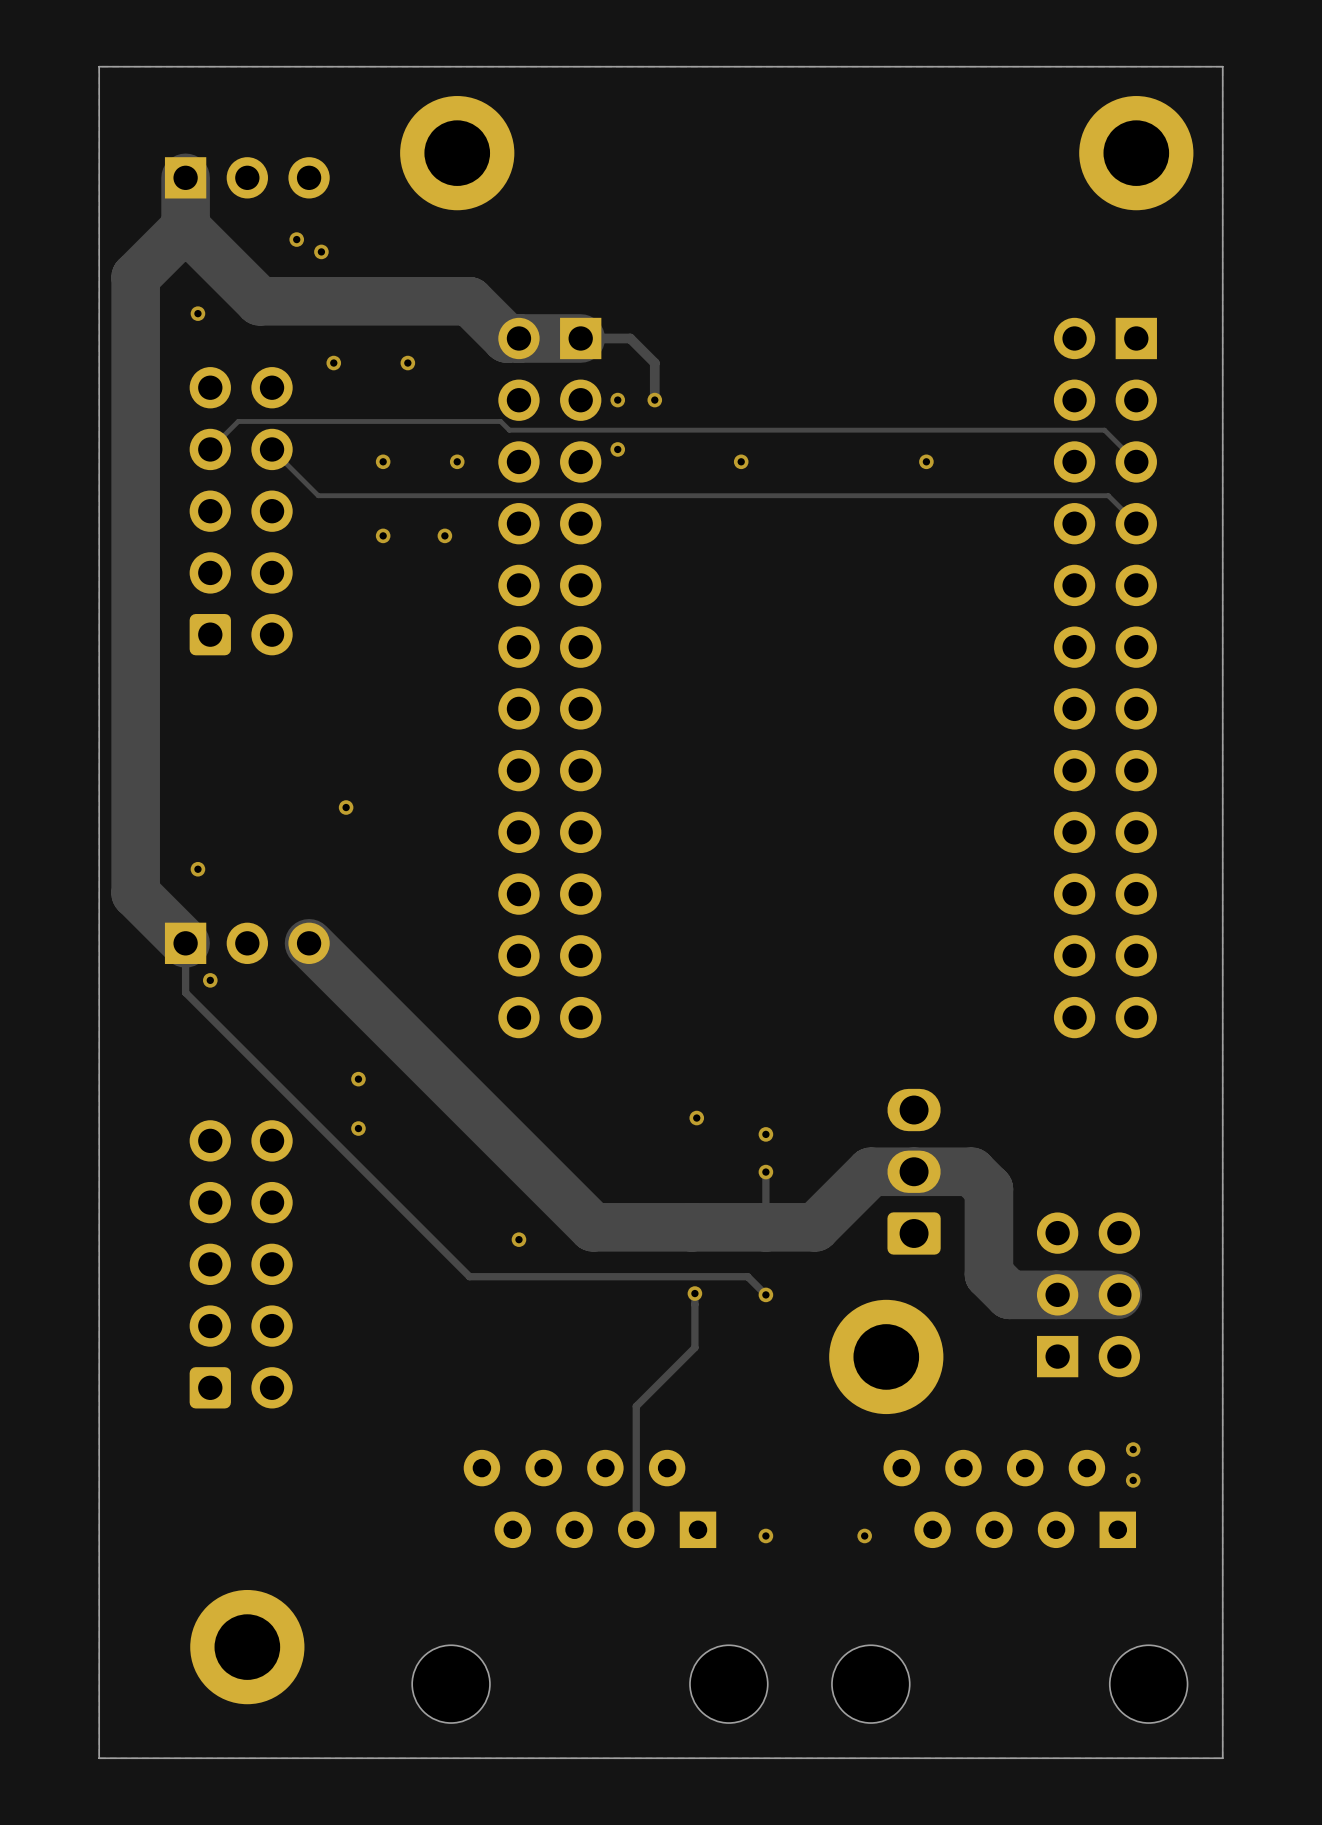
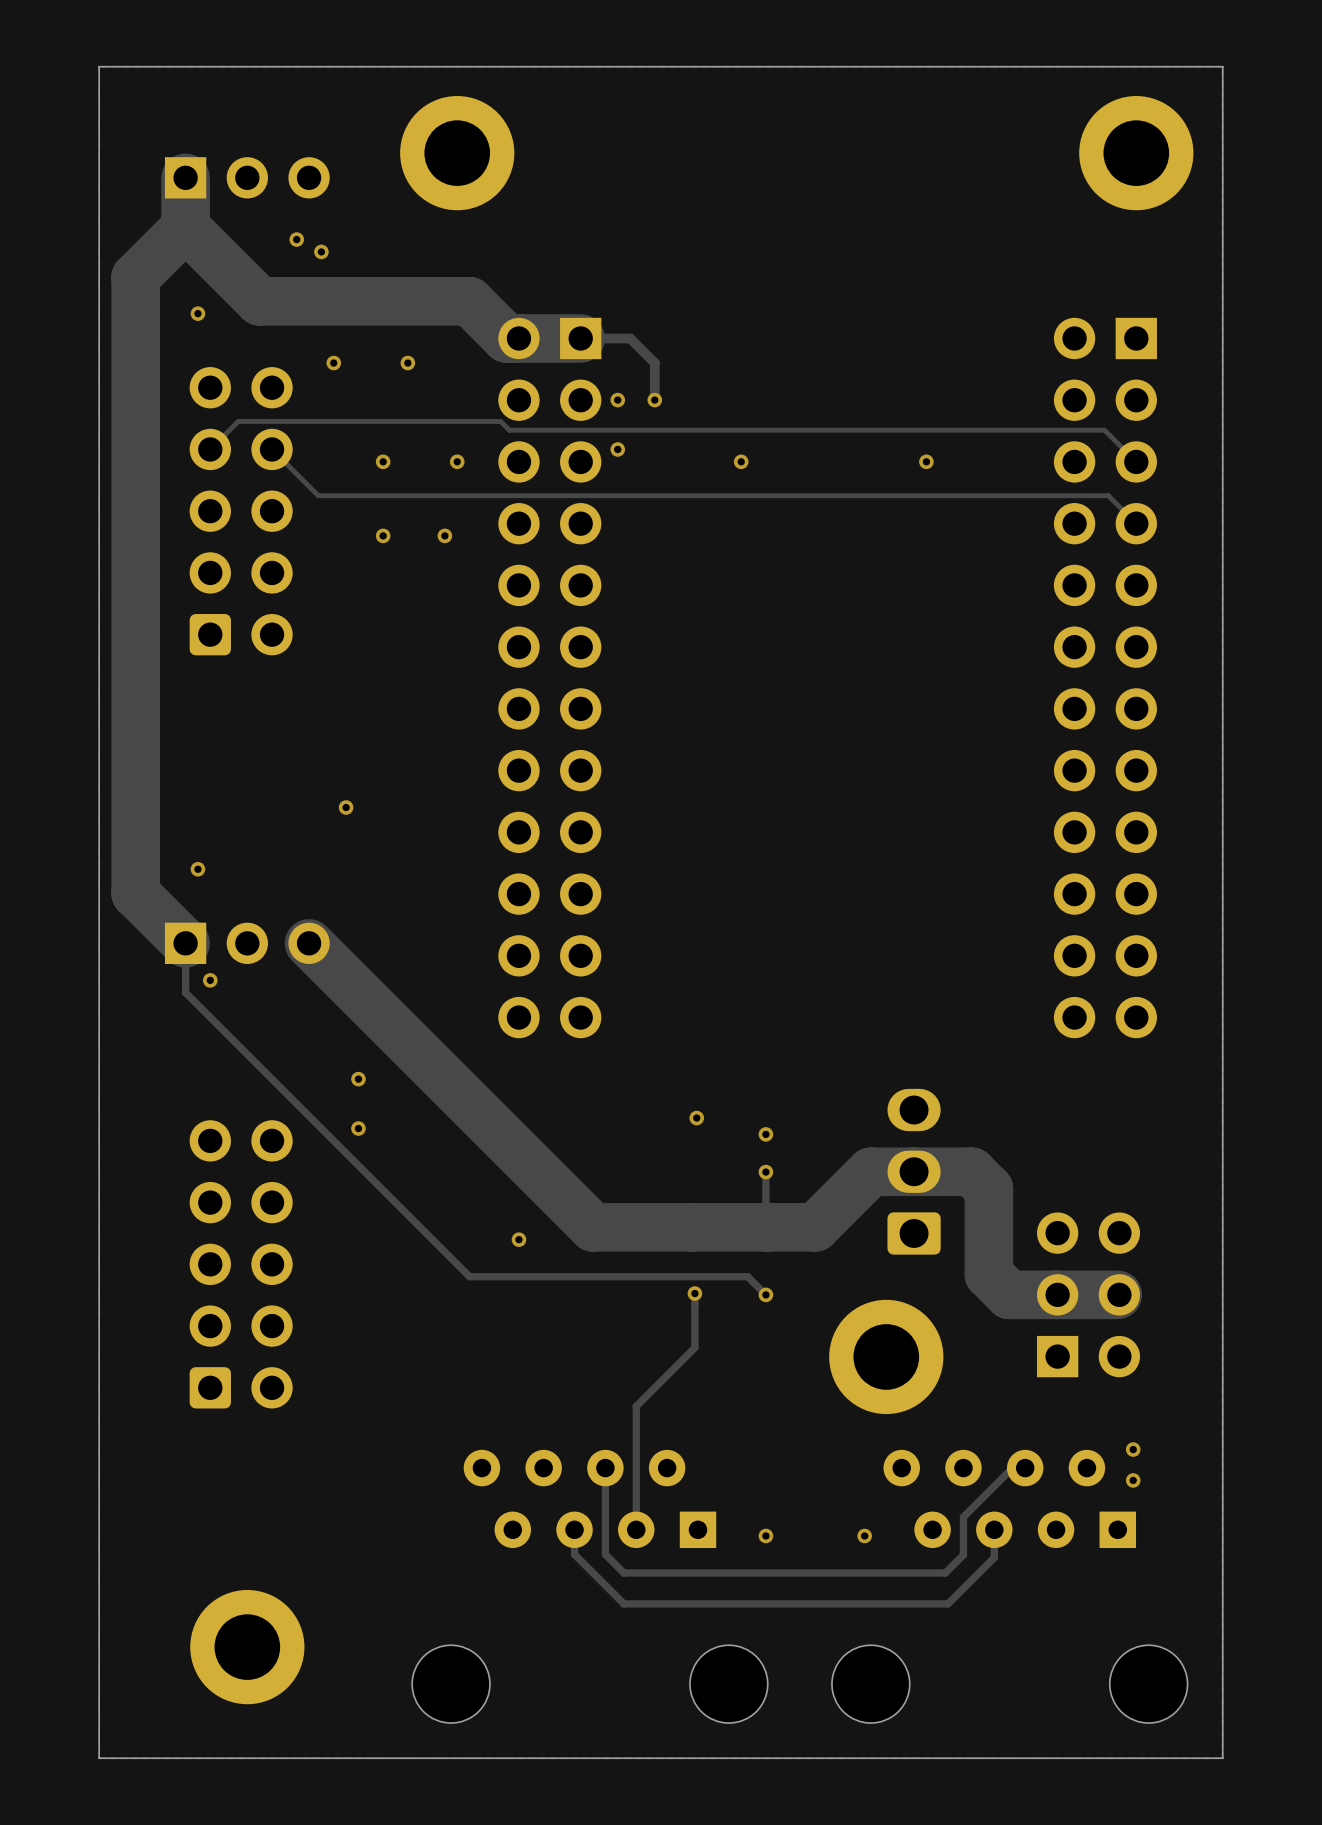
track: none -> (1025, 1468) (1012, 1468) (963, 1517) (963, 1554) (945, 1573) (623, 1573) (605, 1554) (605, 1468)
track: none -> (994, 1529) (994, 1557) (948, 1603) (623, 1603) (574, 1554) (574, 1529)

